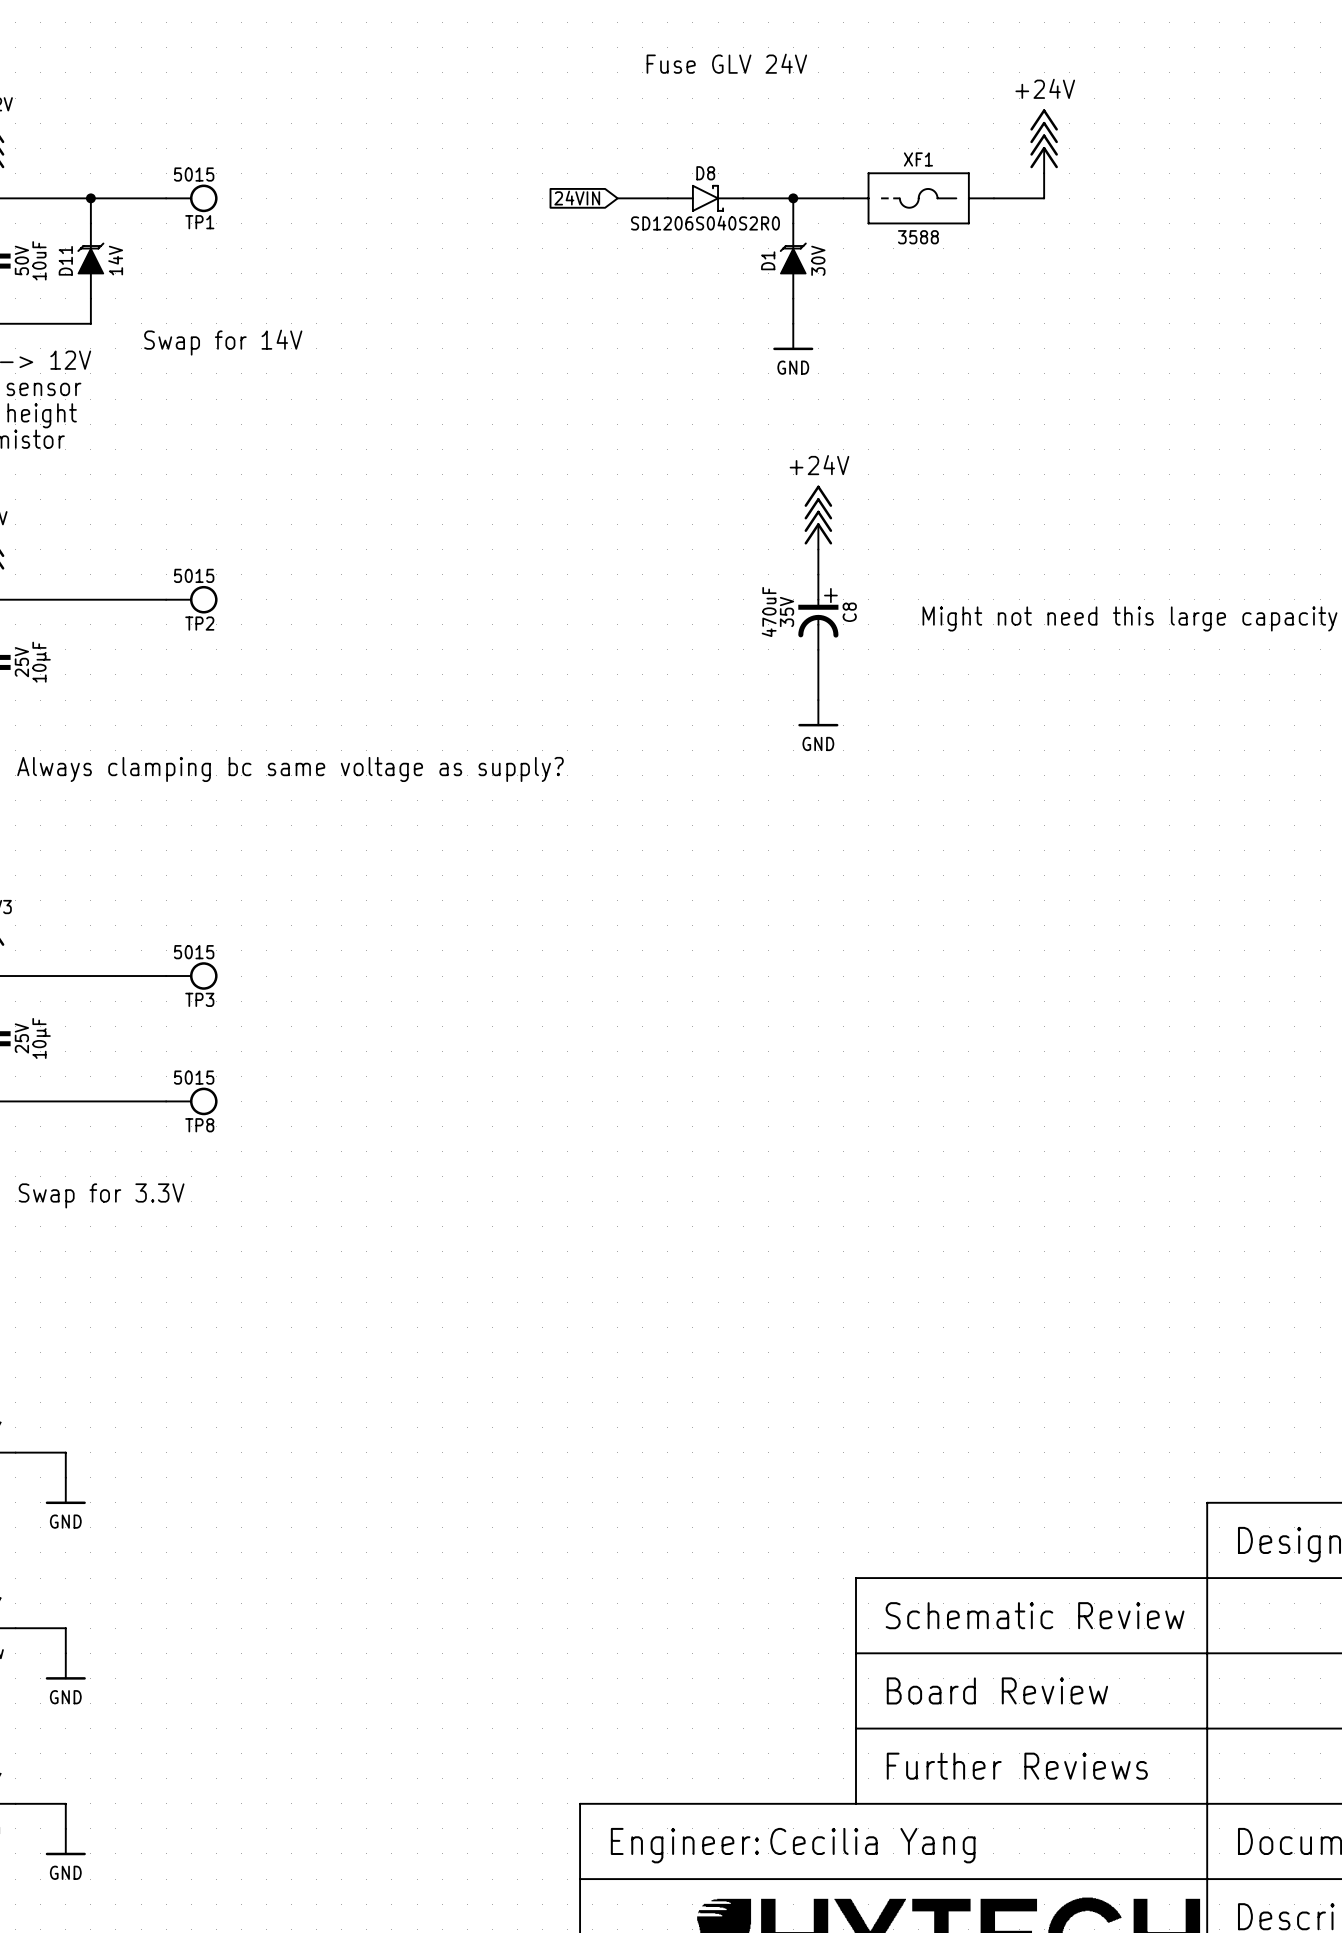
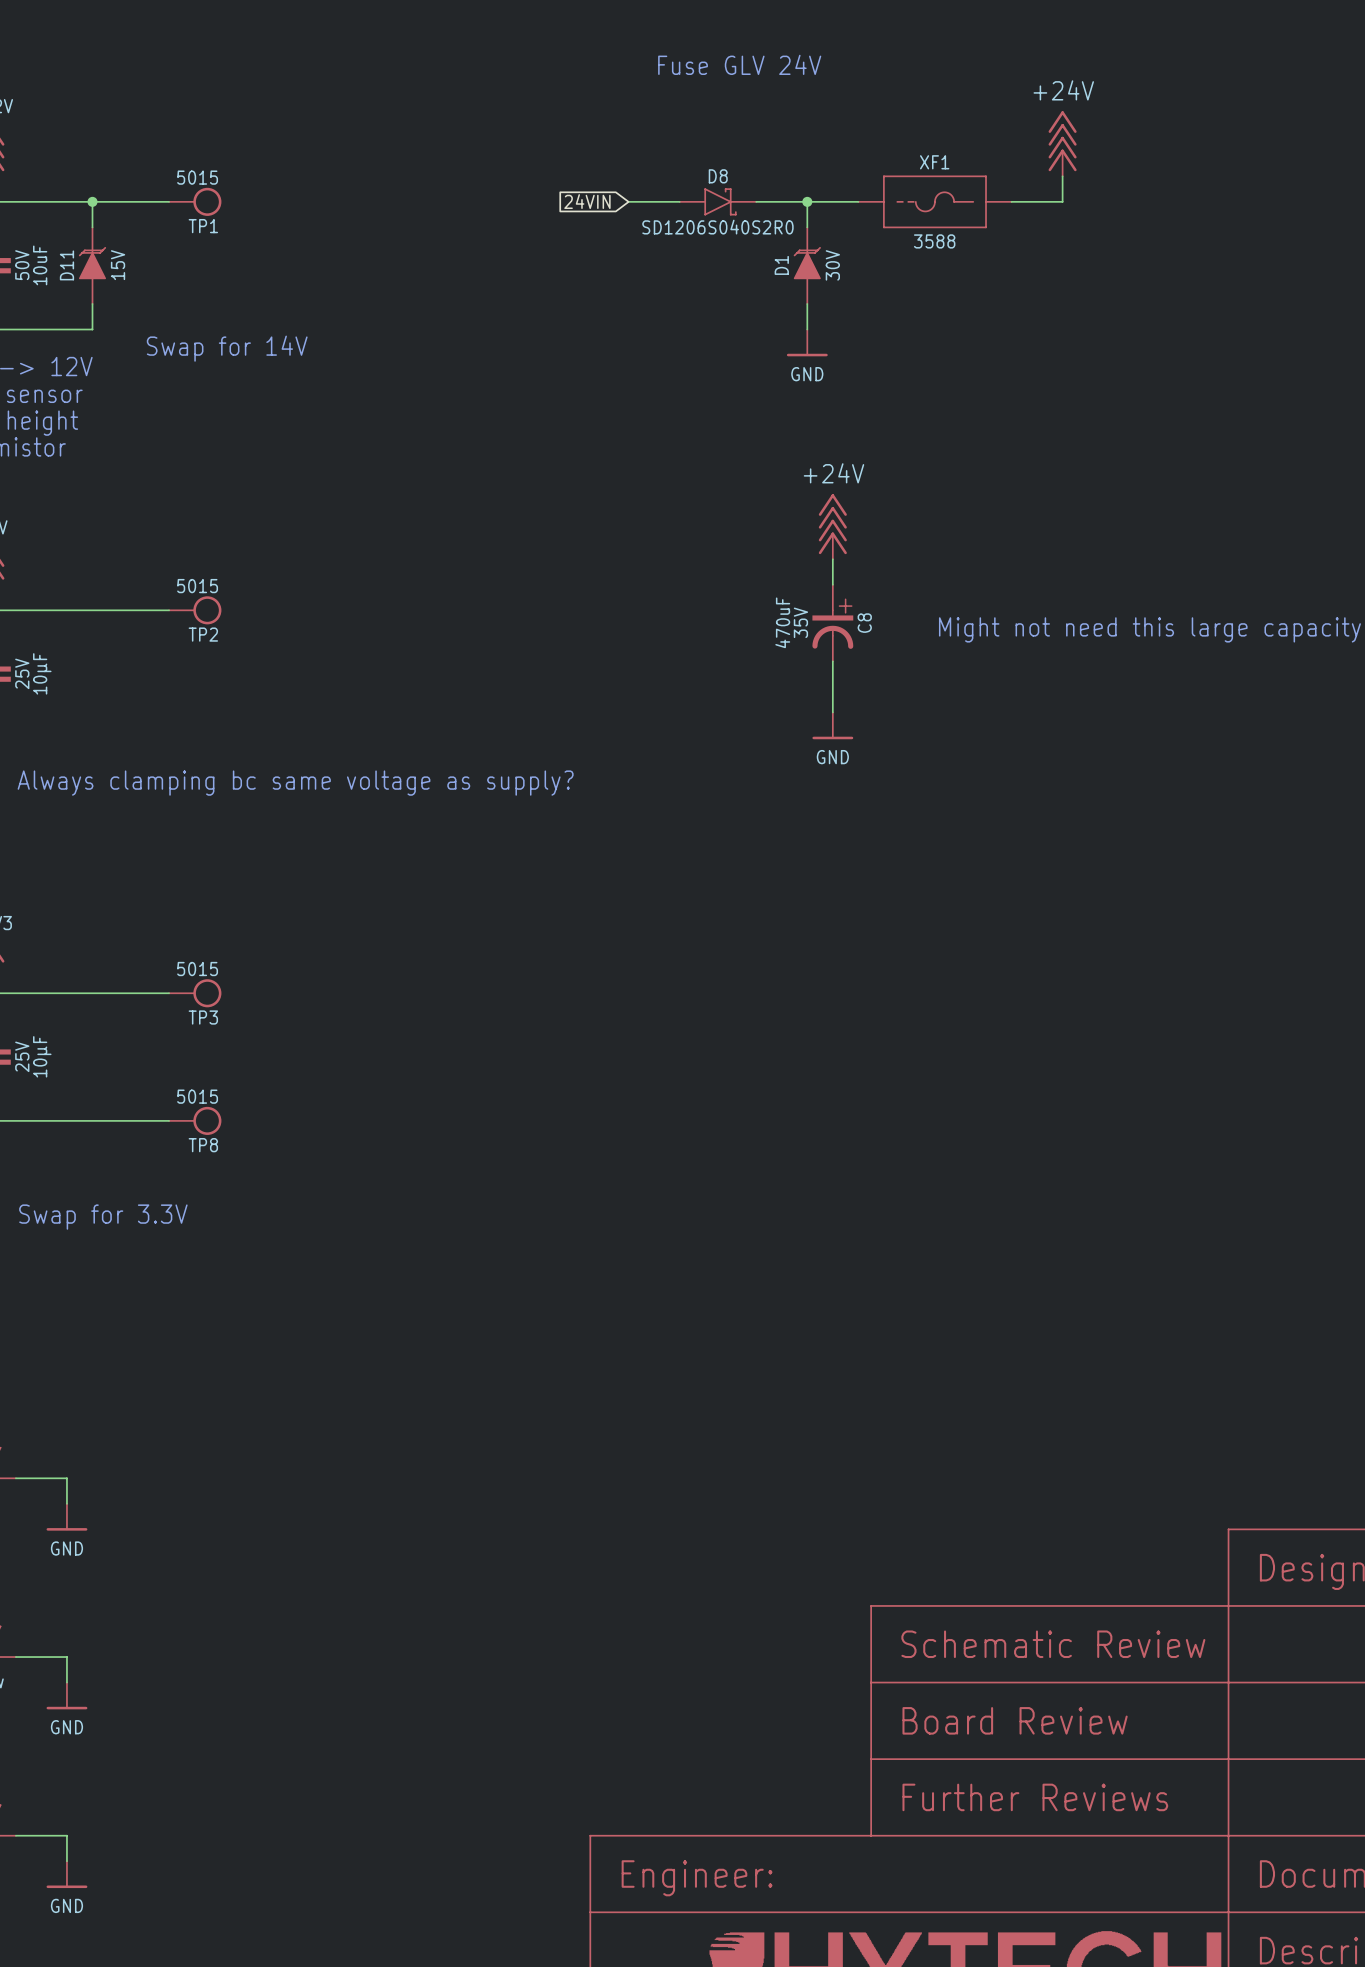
D11 text: 14V (115, 260) -> 15V (118, 265)
text: Cecilia Yang (872, 1845) -> none

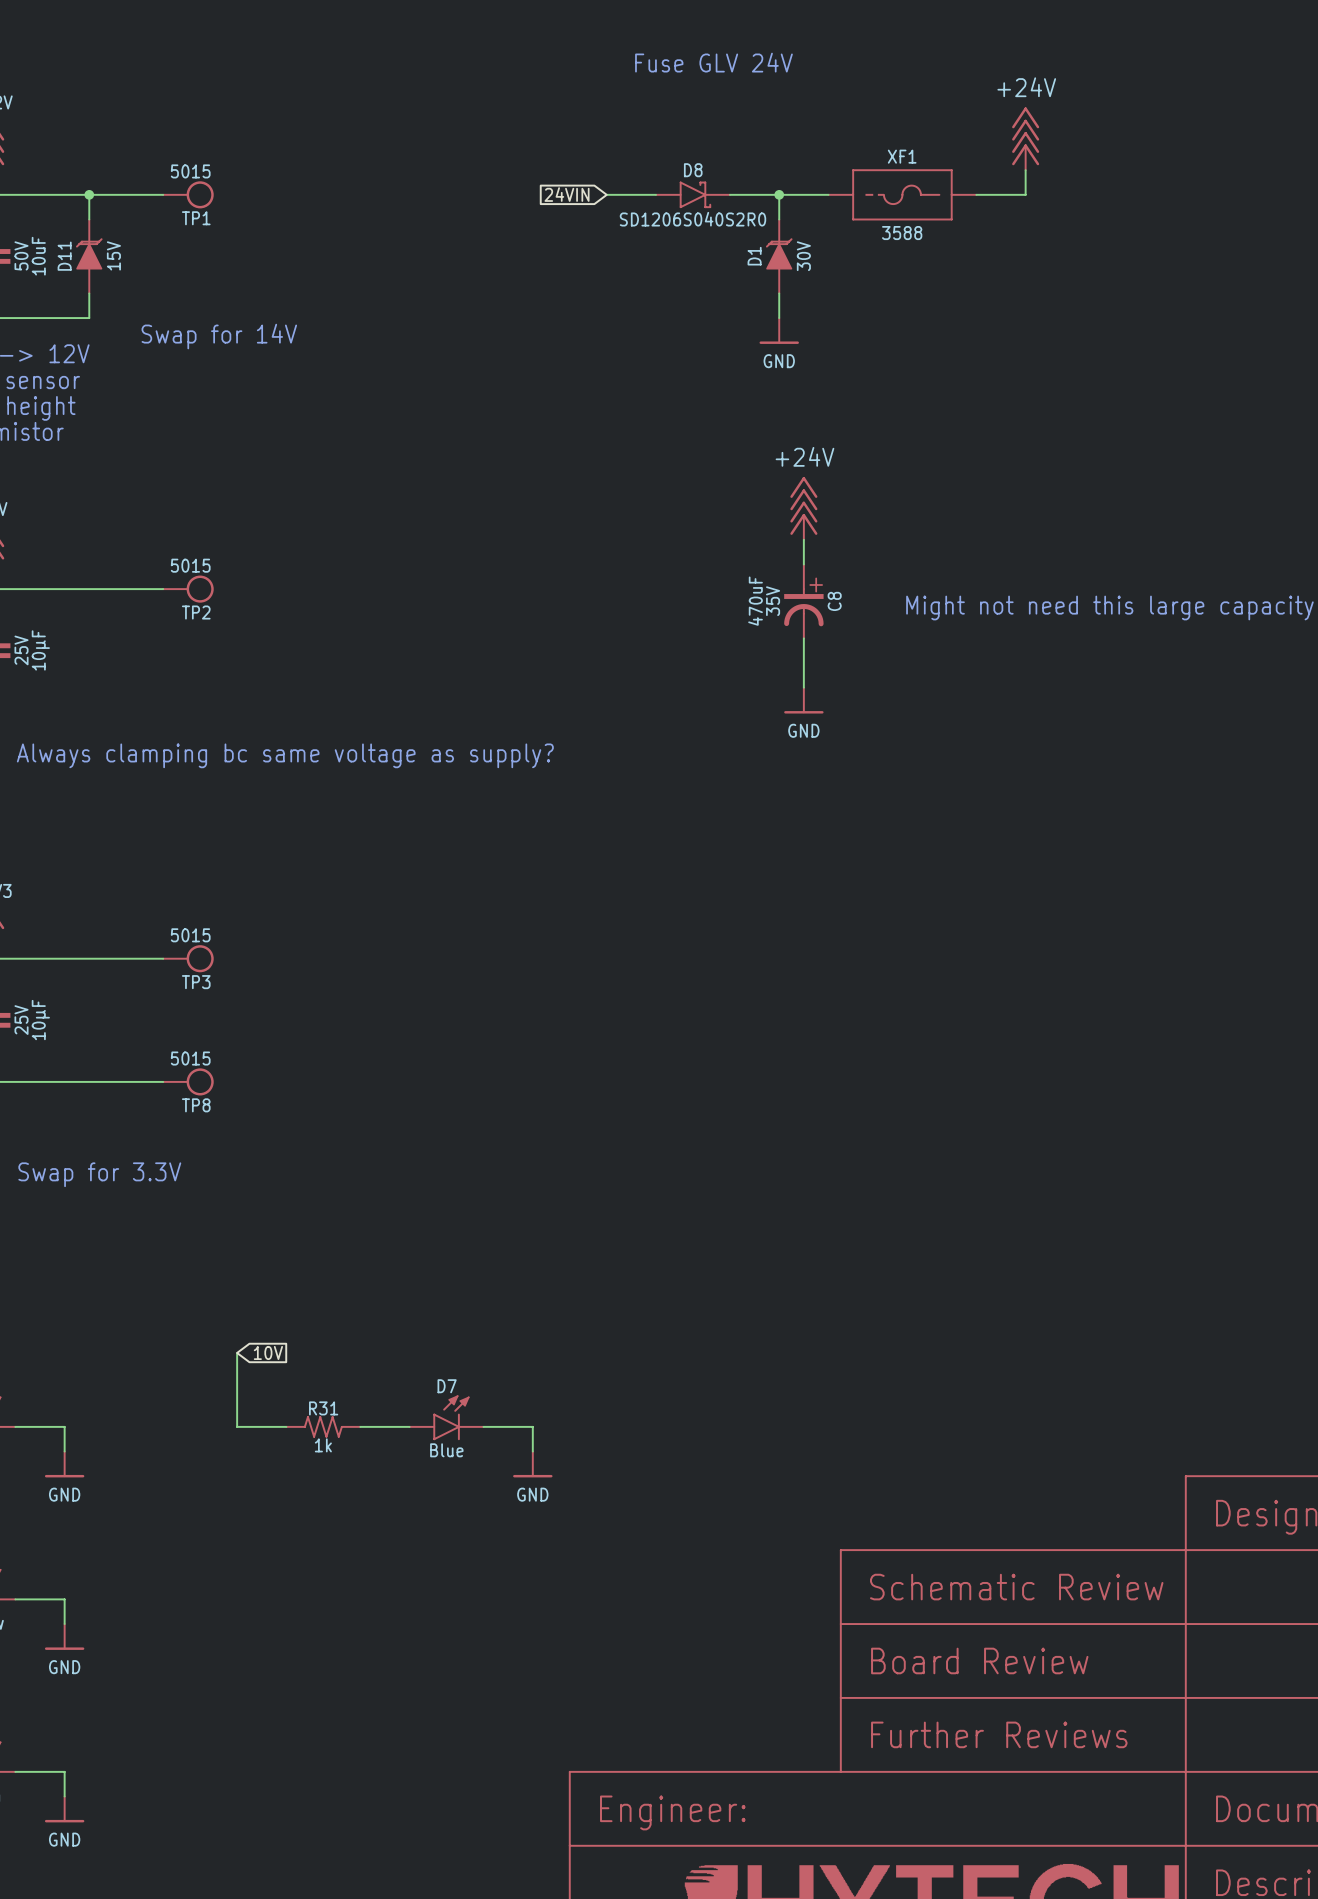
wire: none -> (237, 1352) (237, 1426) (286, 1426)
global label: none -> 10V (268, 1352)
D7: none -> (446, 1417)
R31: none -> (323, 1426)
wire: none -> (360, 1426) (409, 1426)
wire: none -> (483, 1426) (532, 1426) (532, 1451)
power symbol: none -> GND (532, 1464)

